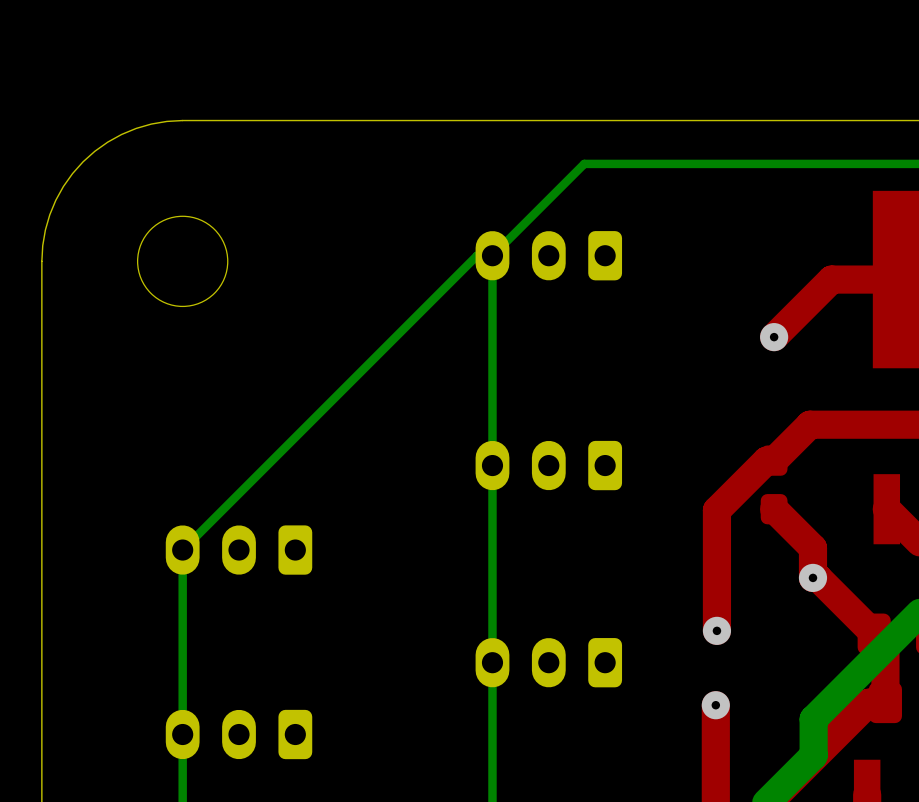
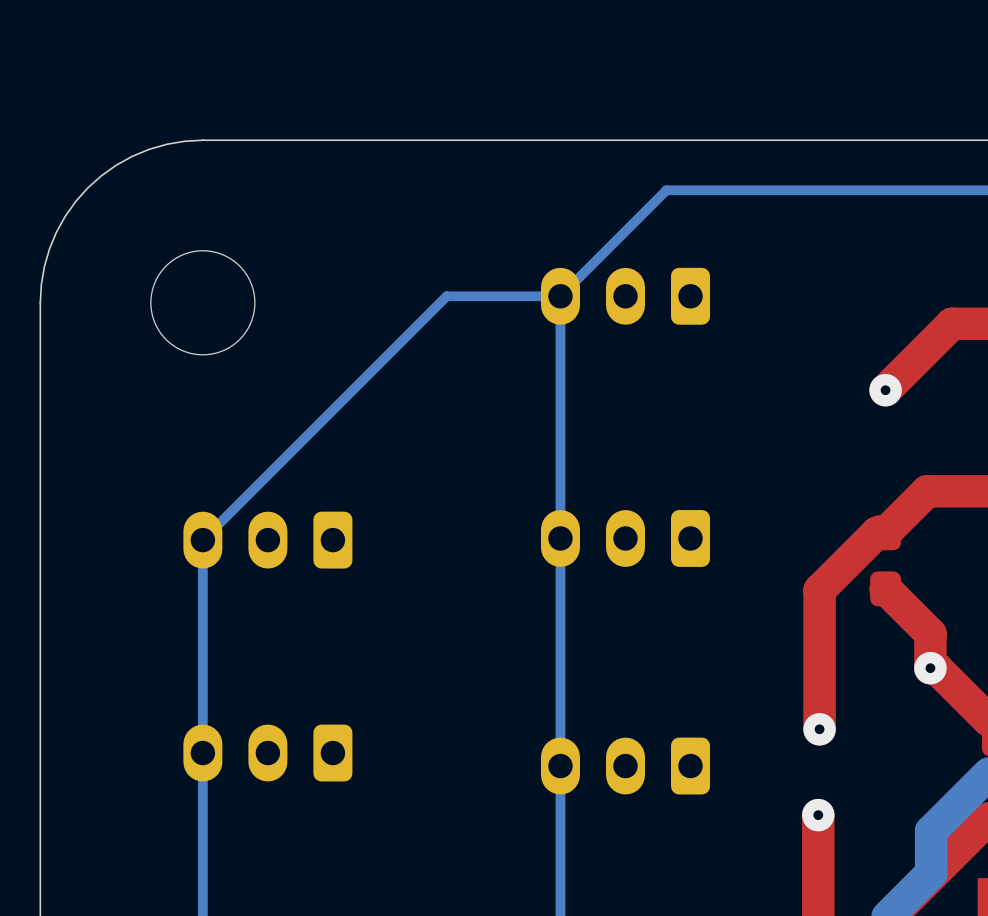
bottom track: (476, 255) (182, 550) -> (542, 296) (446, 296) (202, 540) (202, 636)
part: none -> (267, 540)
part: (239, 550) -> none
part: none -> (267, 753)
part: (239, 734) -> none

